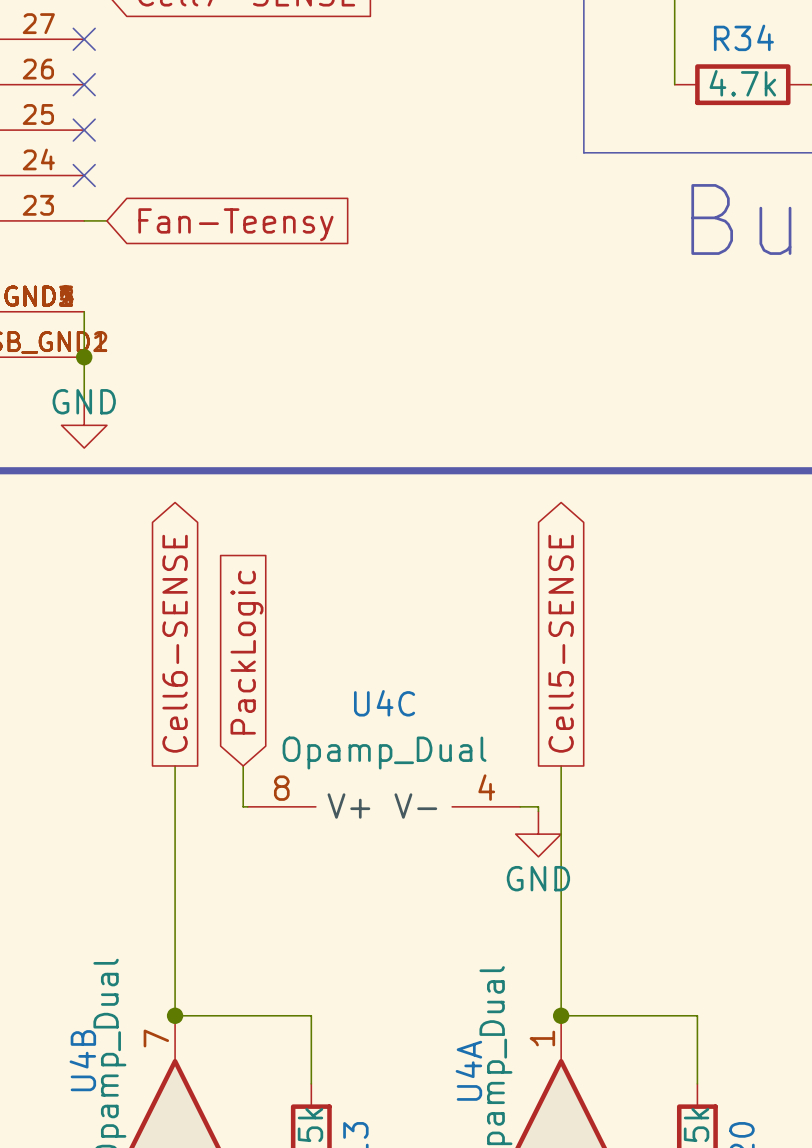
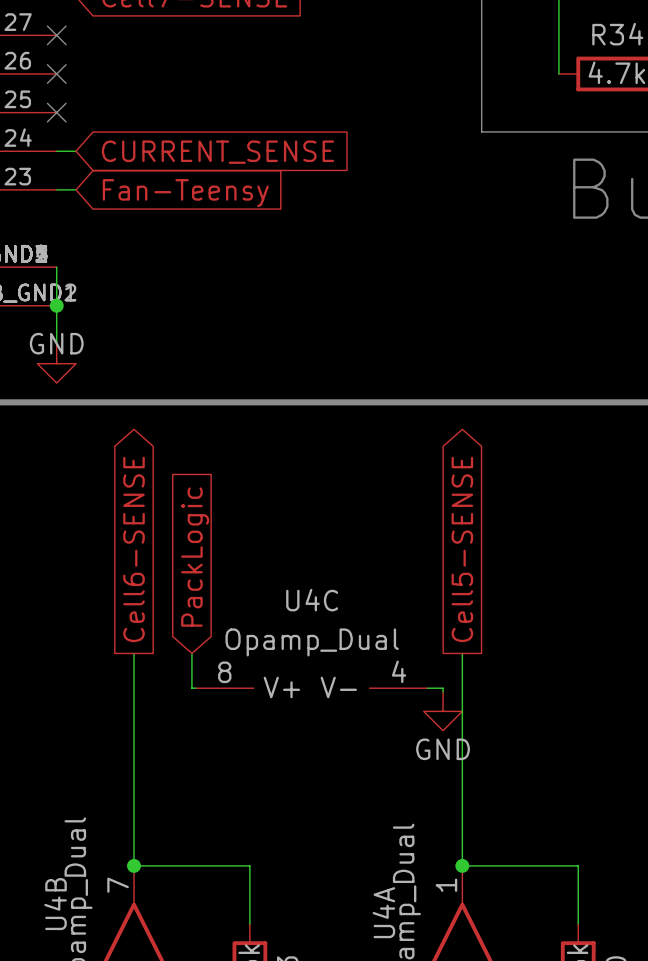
wire: none -> (56, 151) (76, 151)
no-connect mark: (84, 175) -> none
global label: none -> CURRENT_SENSE (217, 152)

